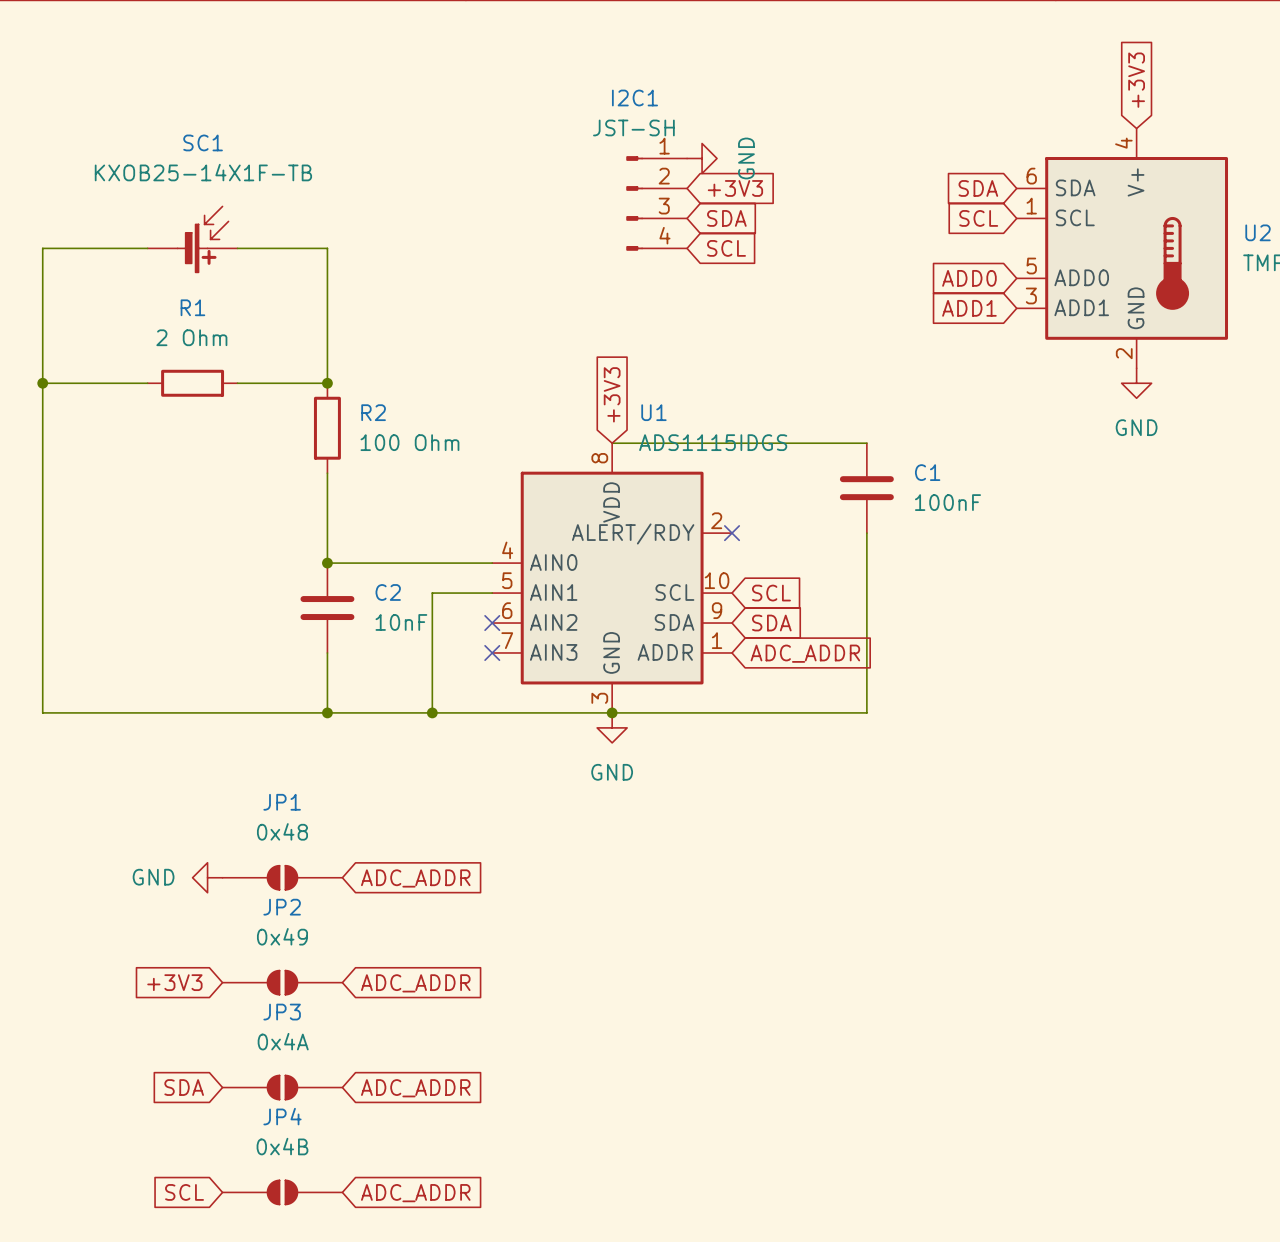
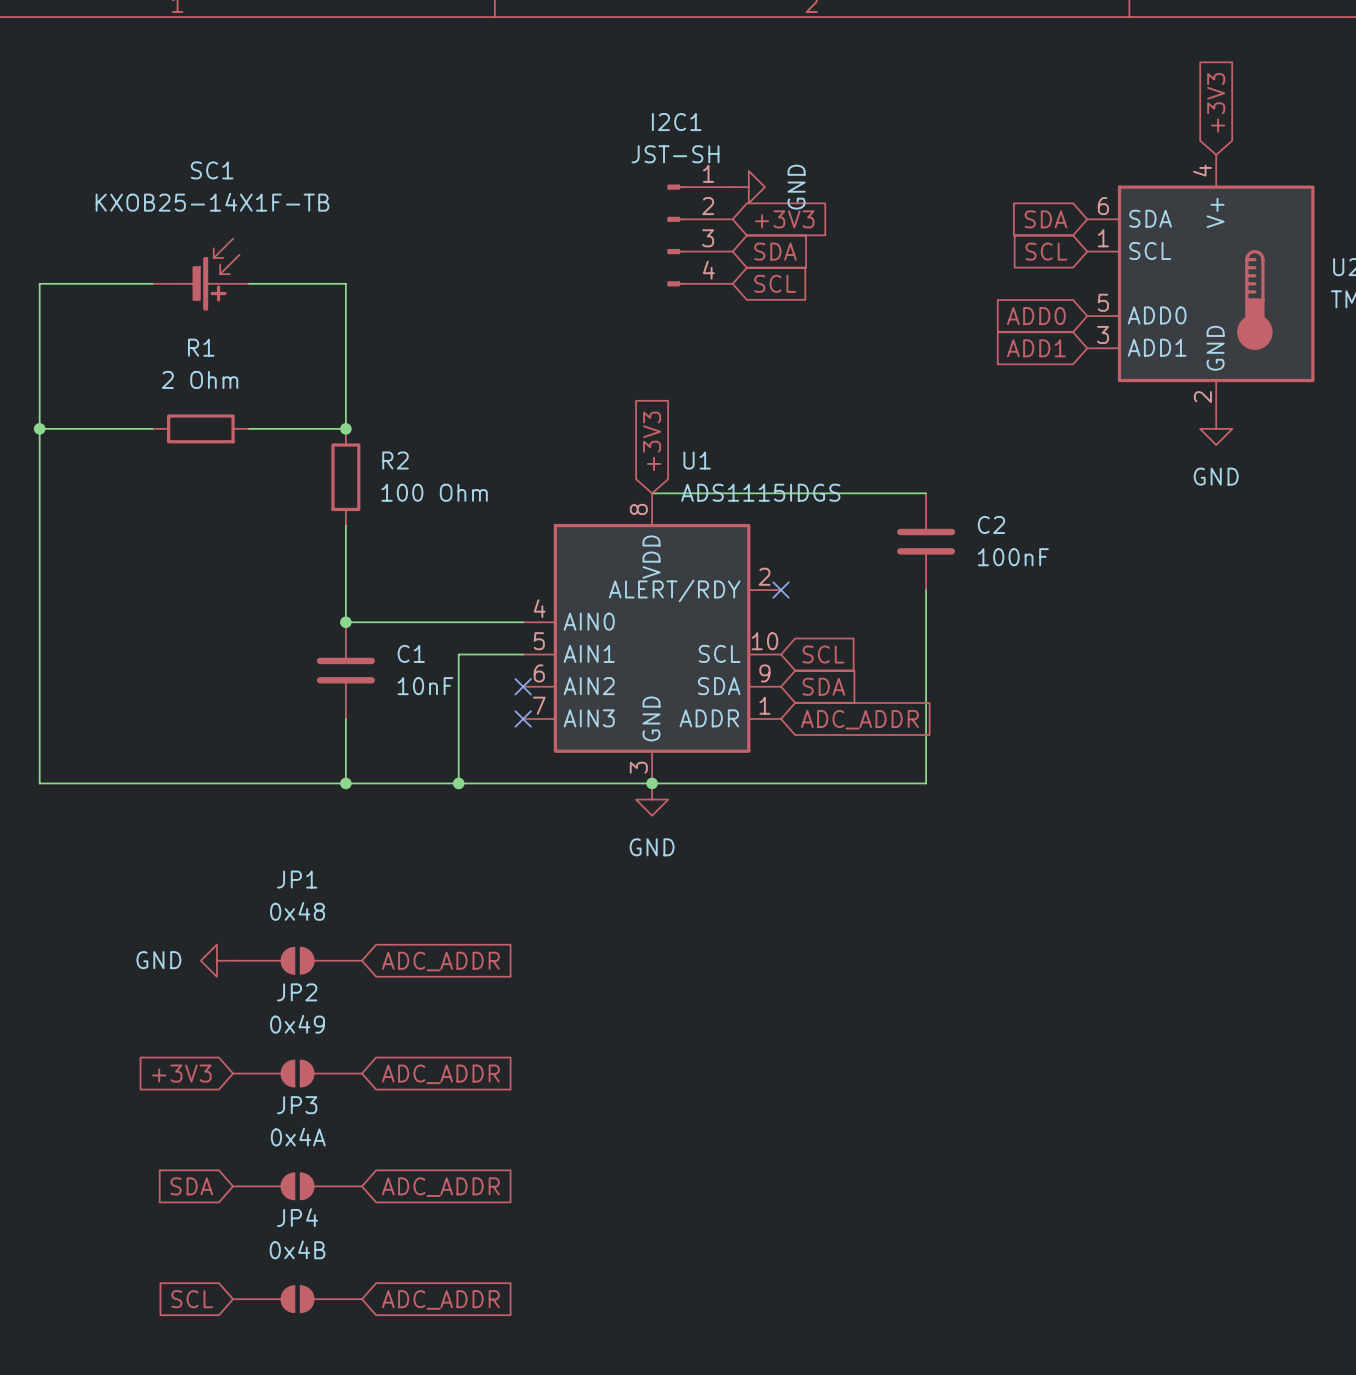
C1 name: C1 (927, 472) -> C2 (991, 524)
C2 name: C2 (388, 592) -> C1 (411, 653)

